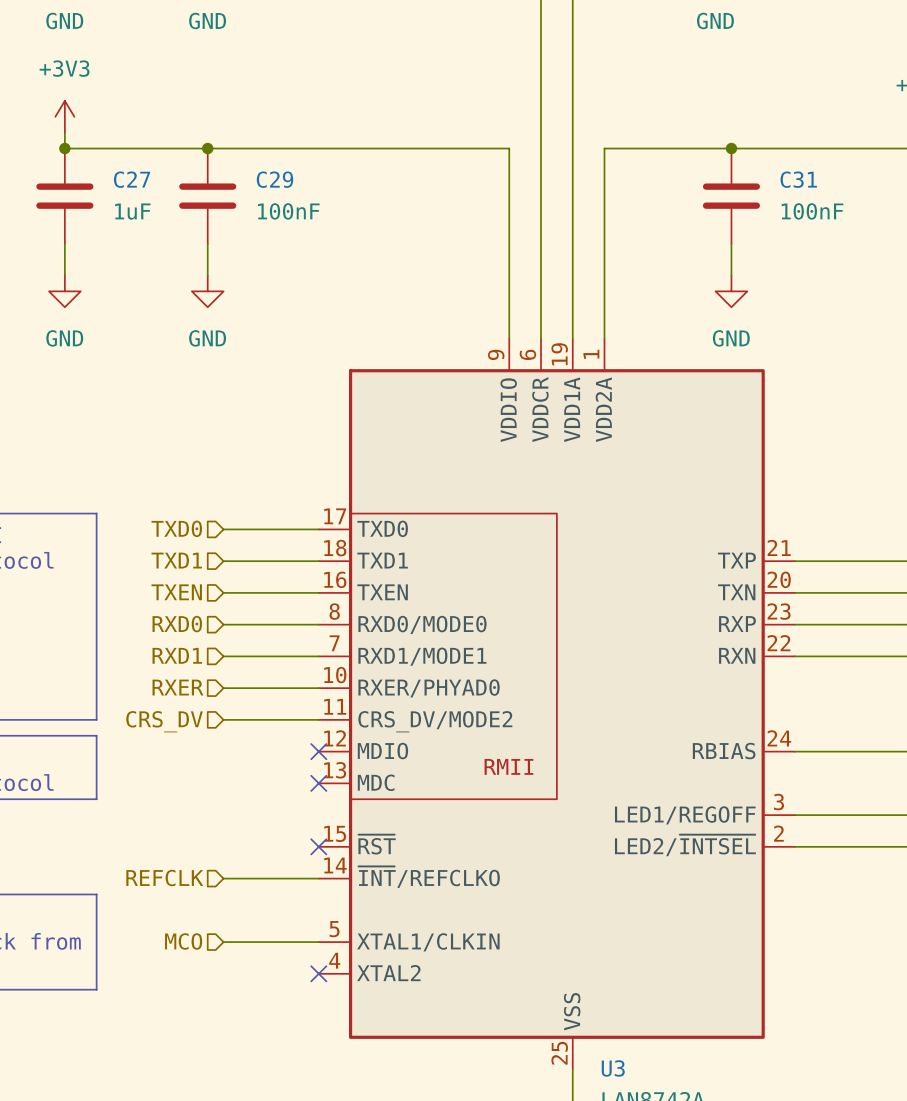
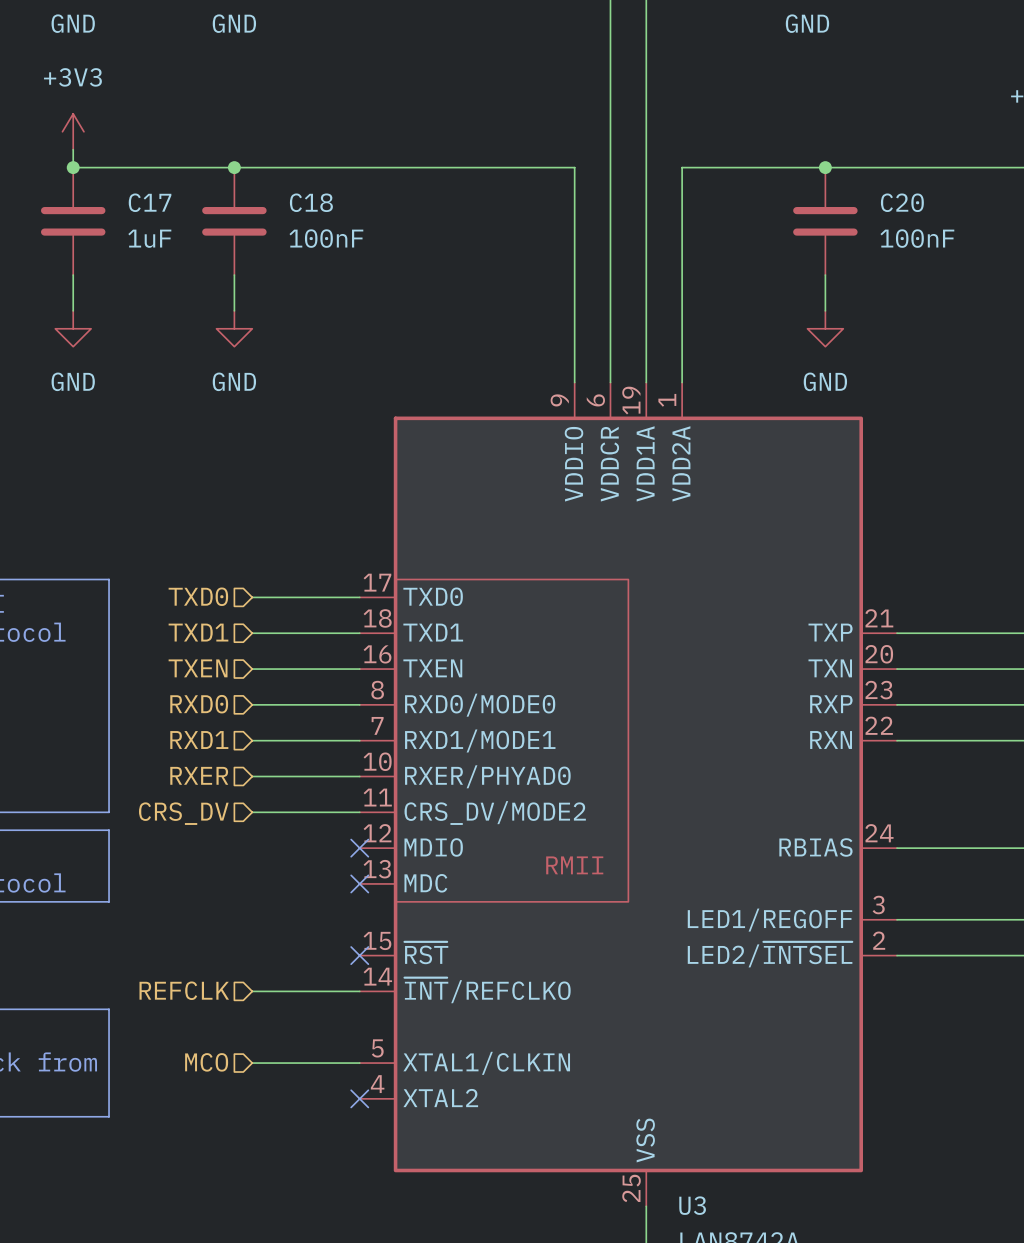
C27 name: C27 (132, 179) -> C17 (150, 202)
C29 name: C29 (274, 179) -> C18 (311, 202)
C31 name: C31 (798, 179) -> C20 (902, 202)

